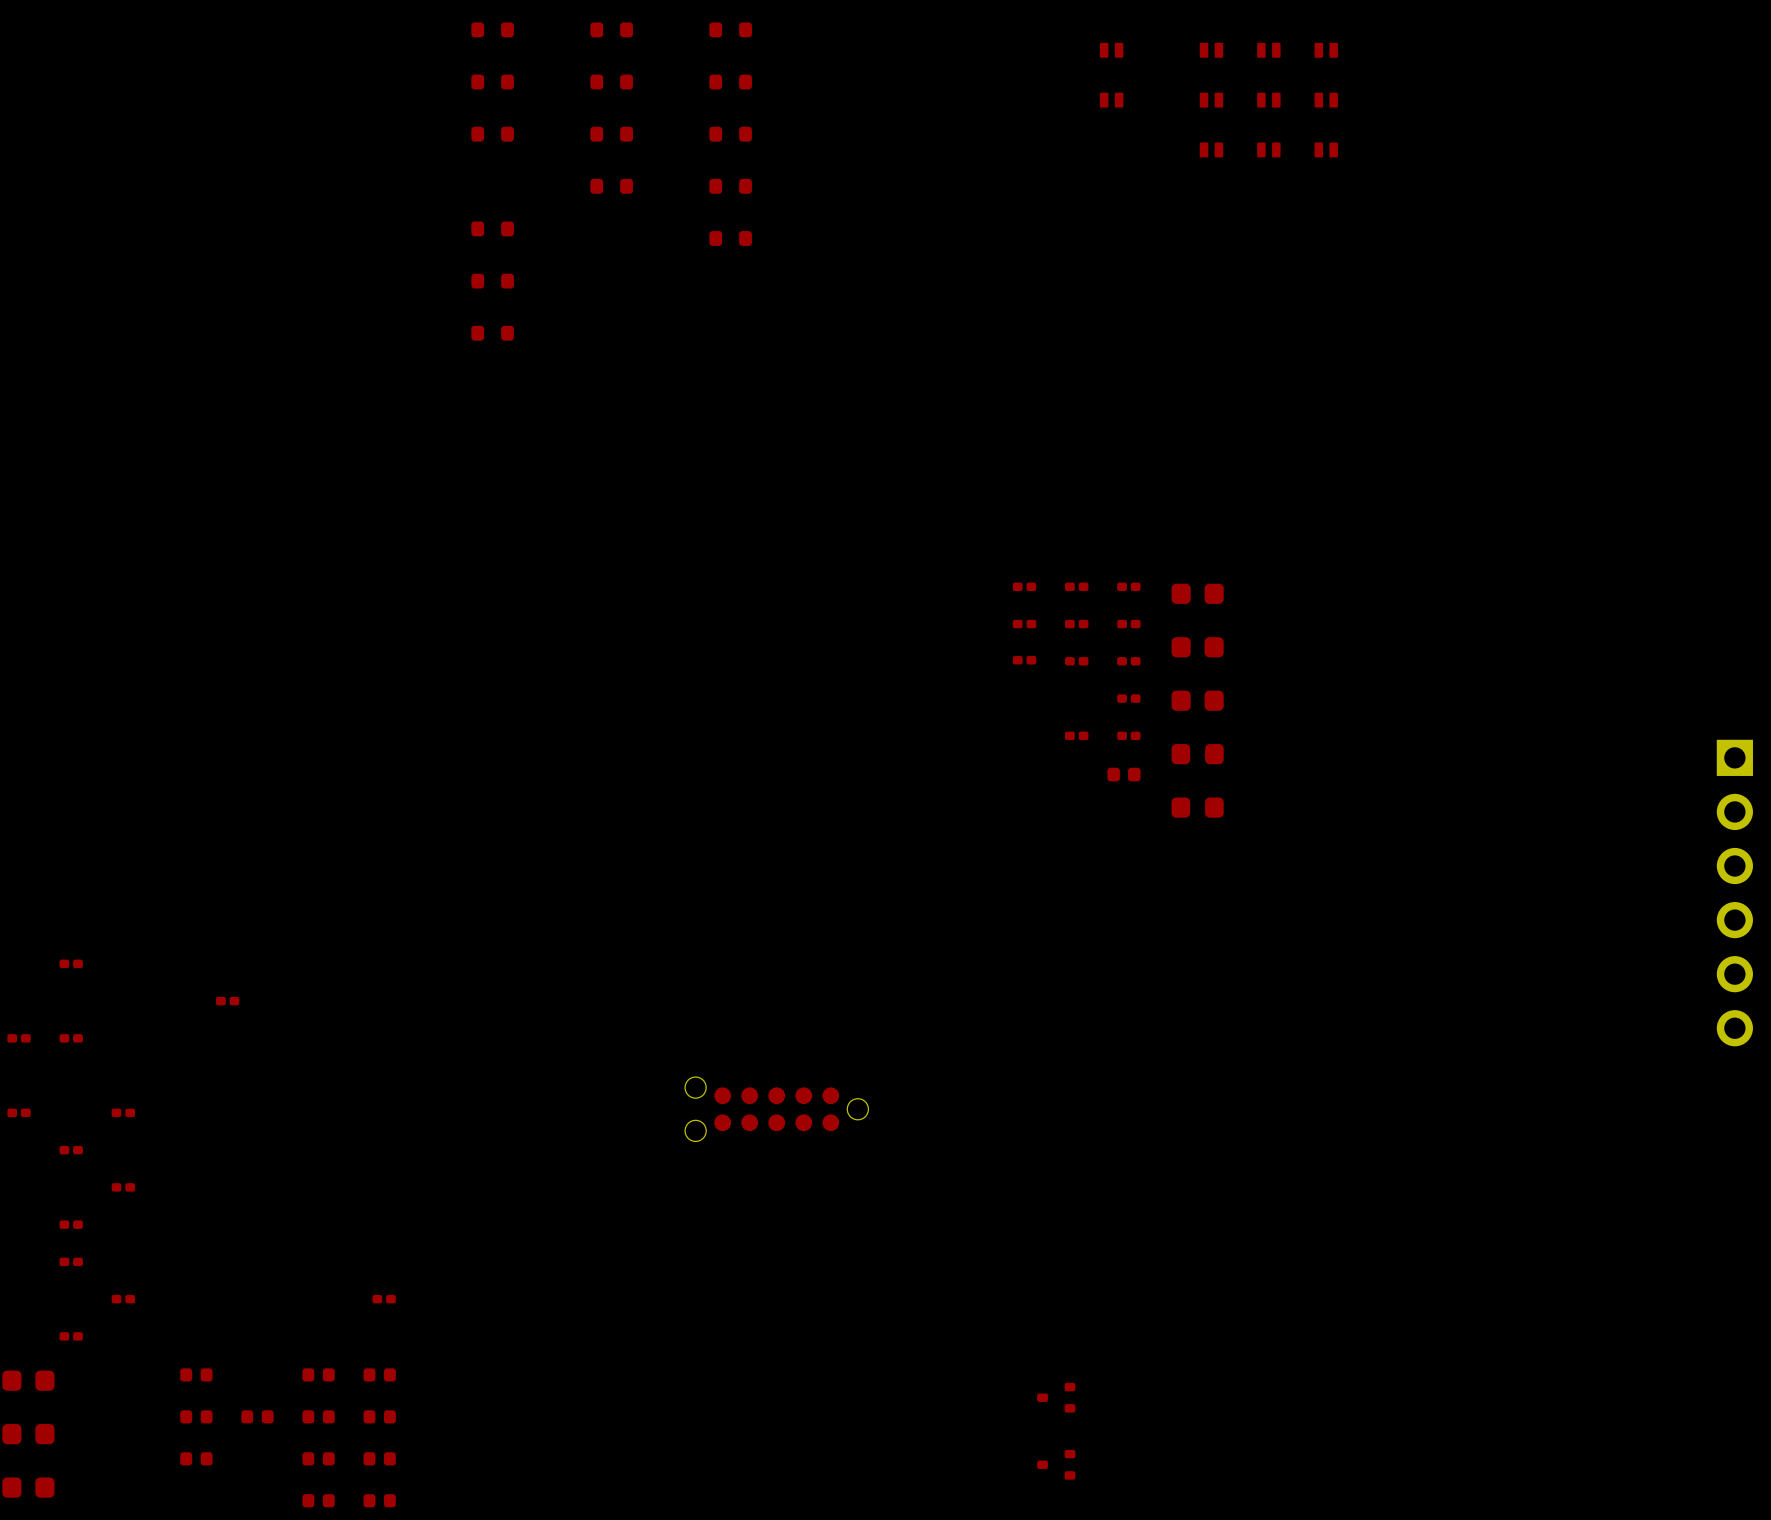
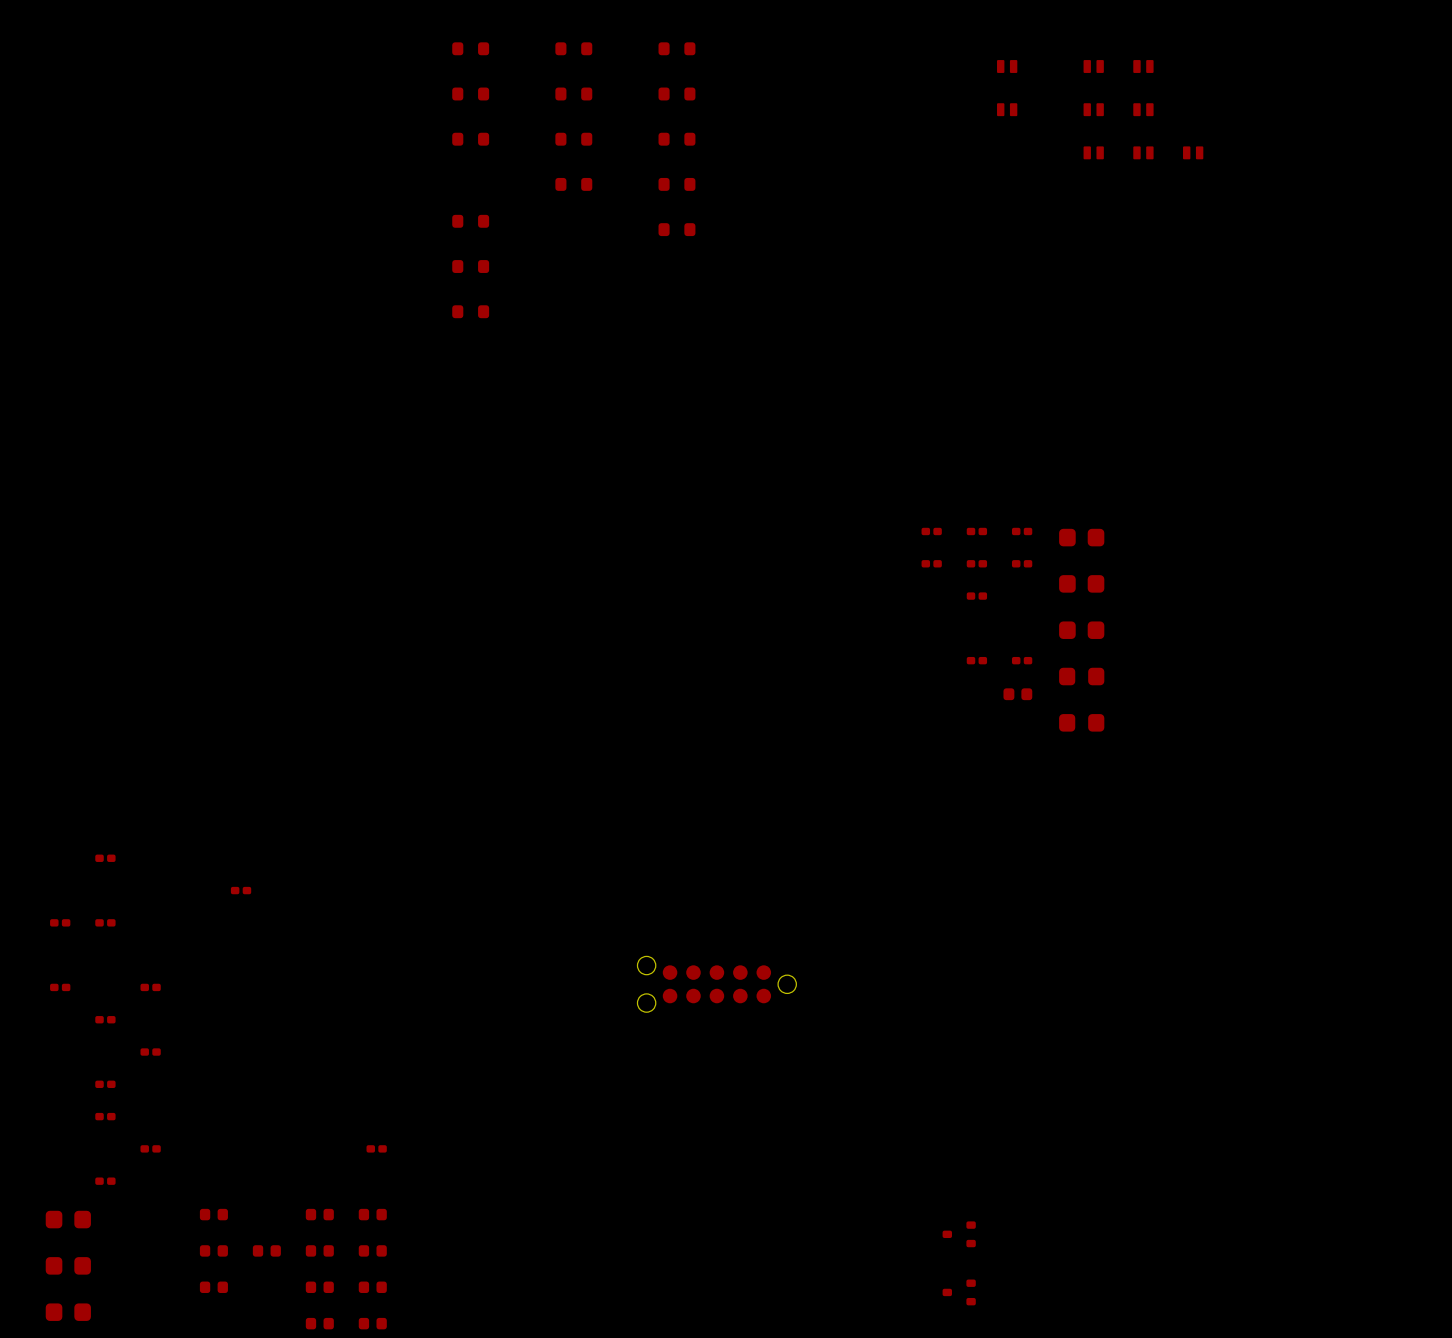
part: (1326, 50) -> none
part: (1326, 100) -> none
part: (1024, 660) -> none
part: (1128, 661) -> none
part: (1128, 698) -> none

